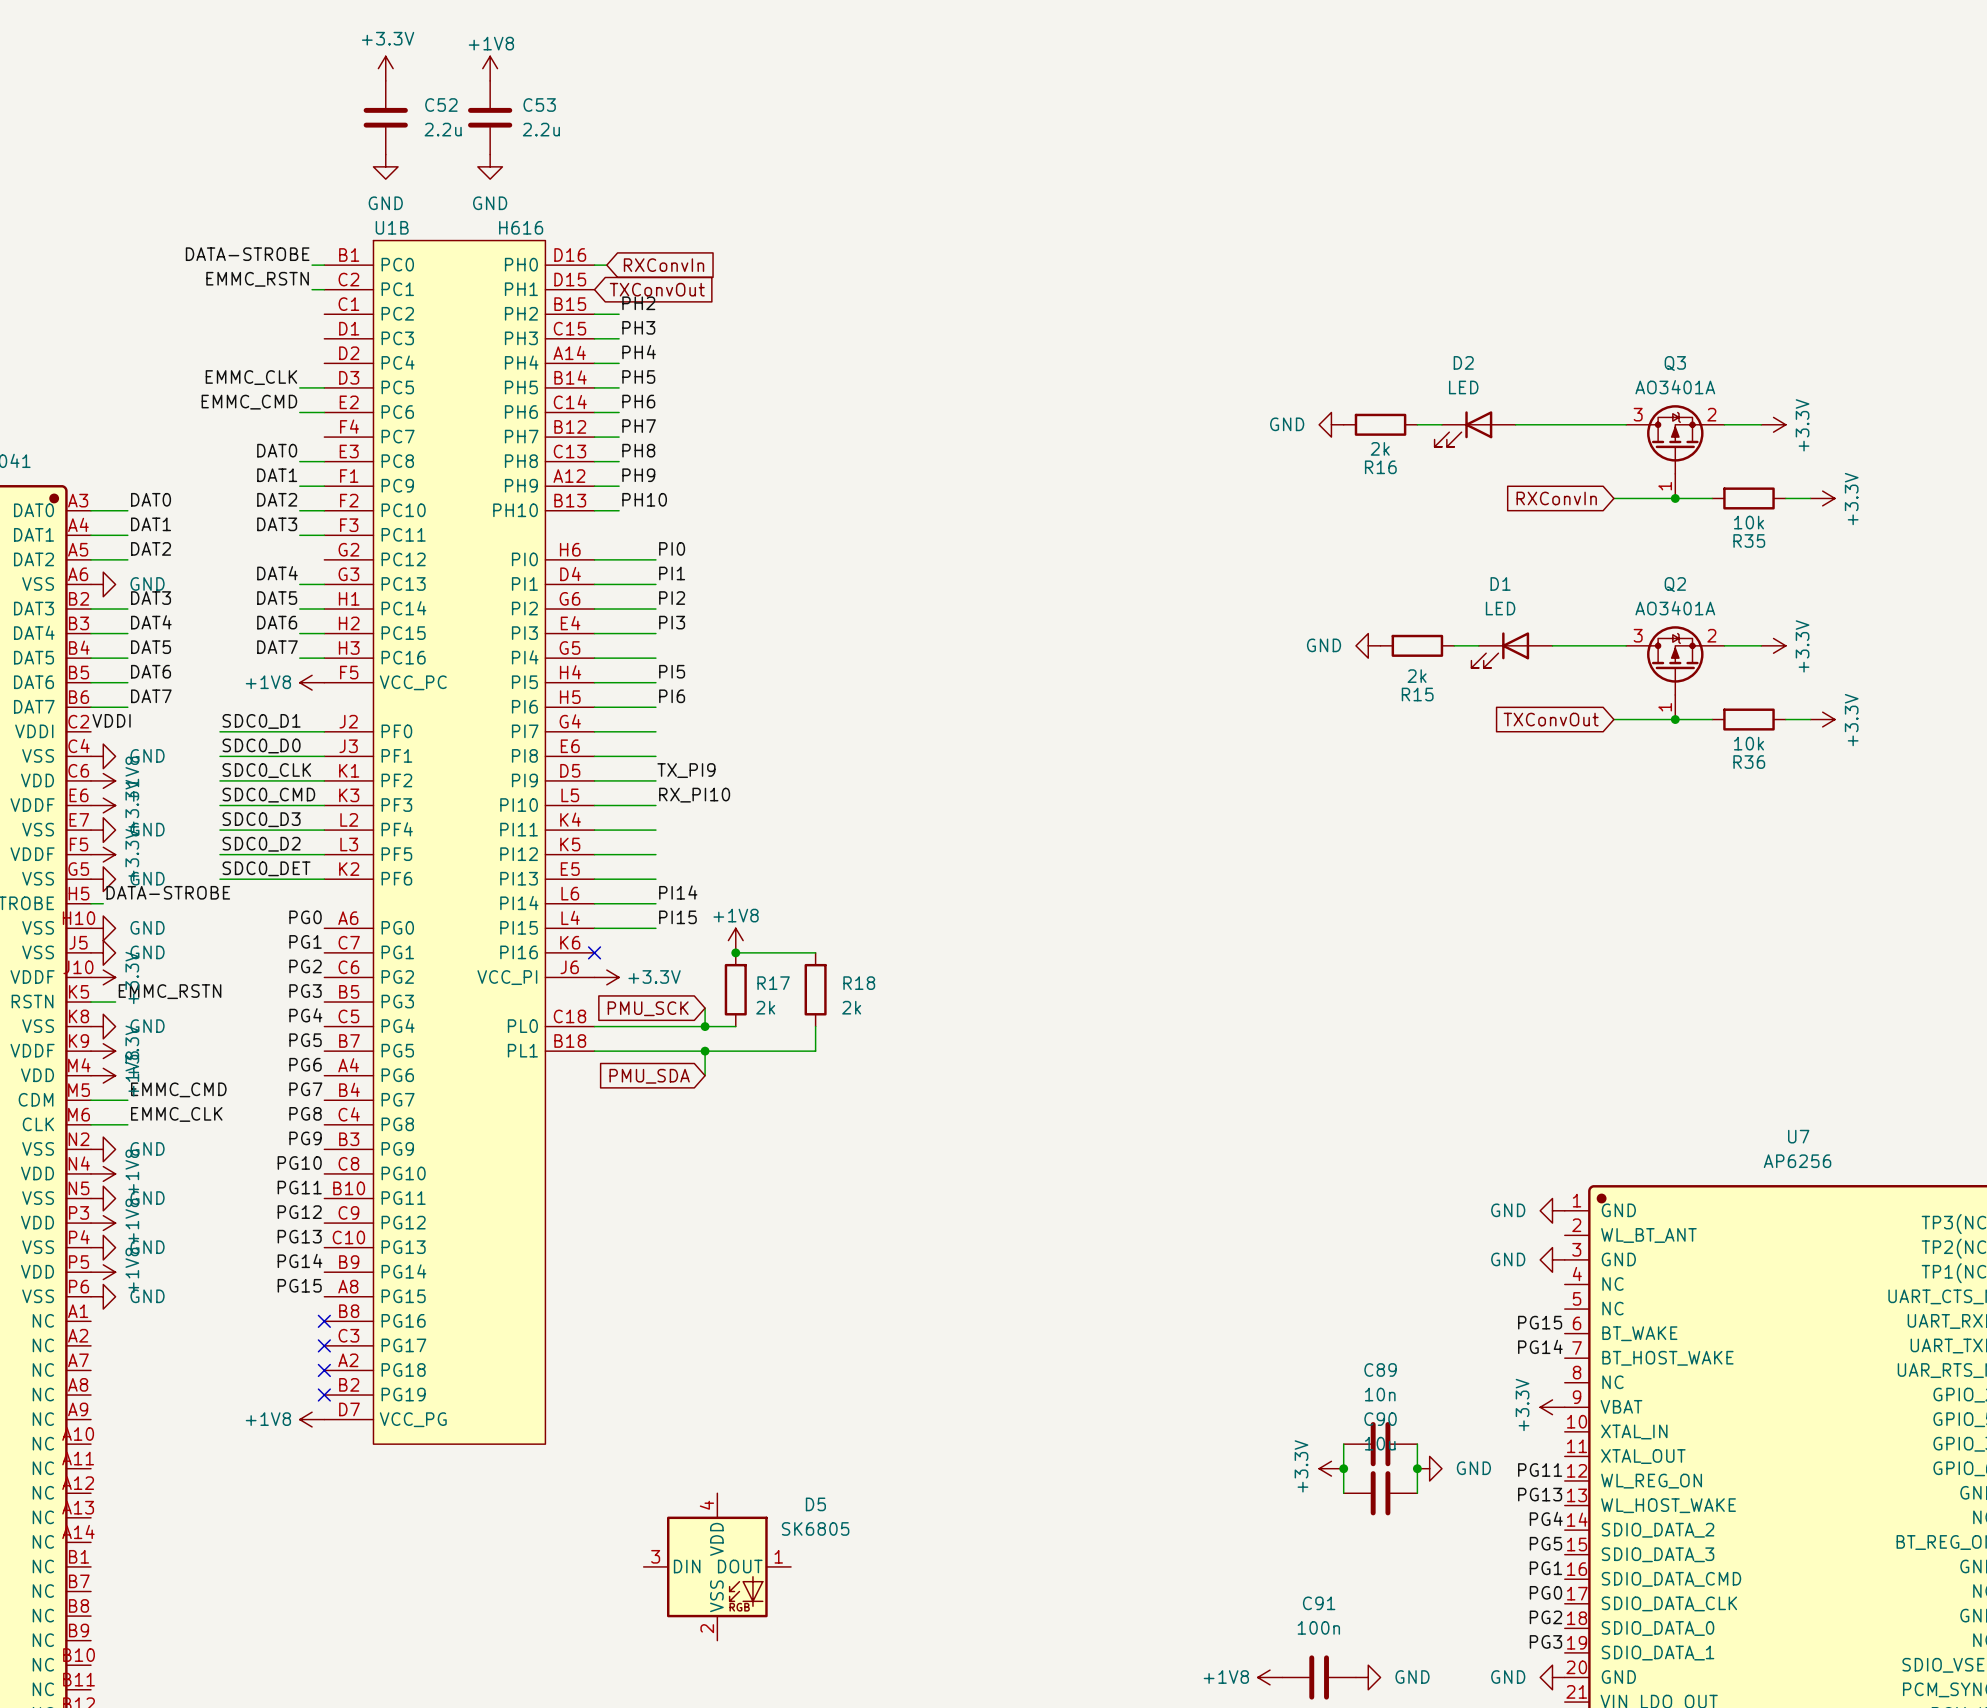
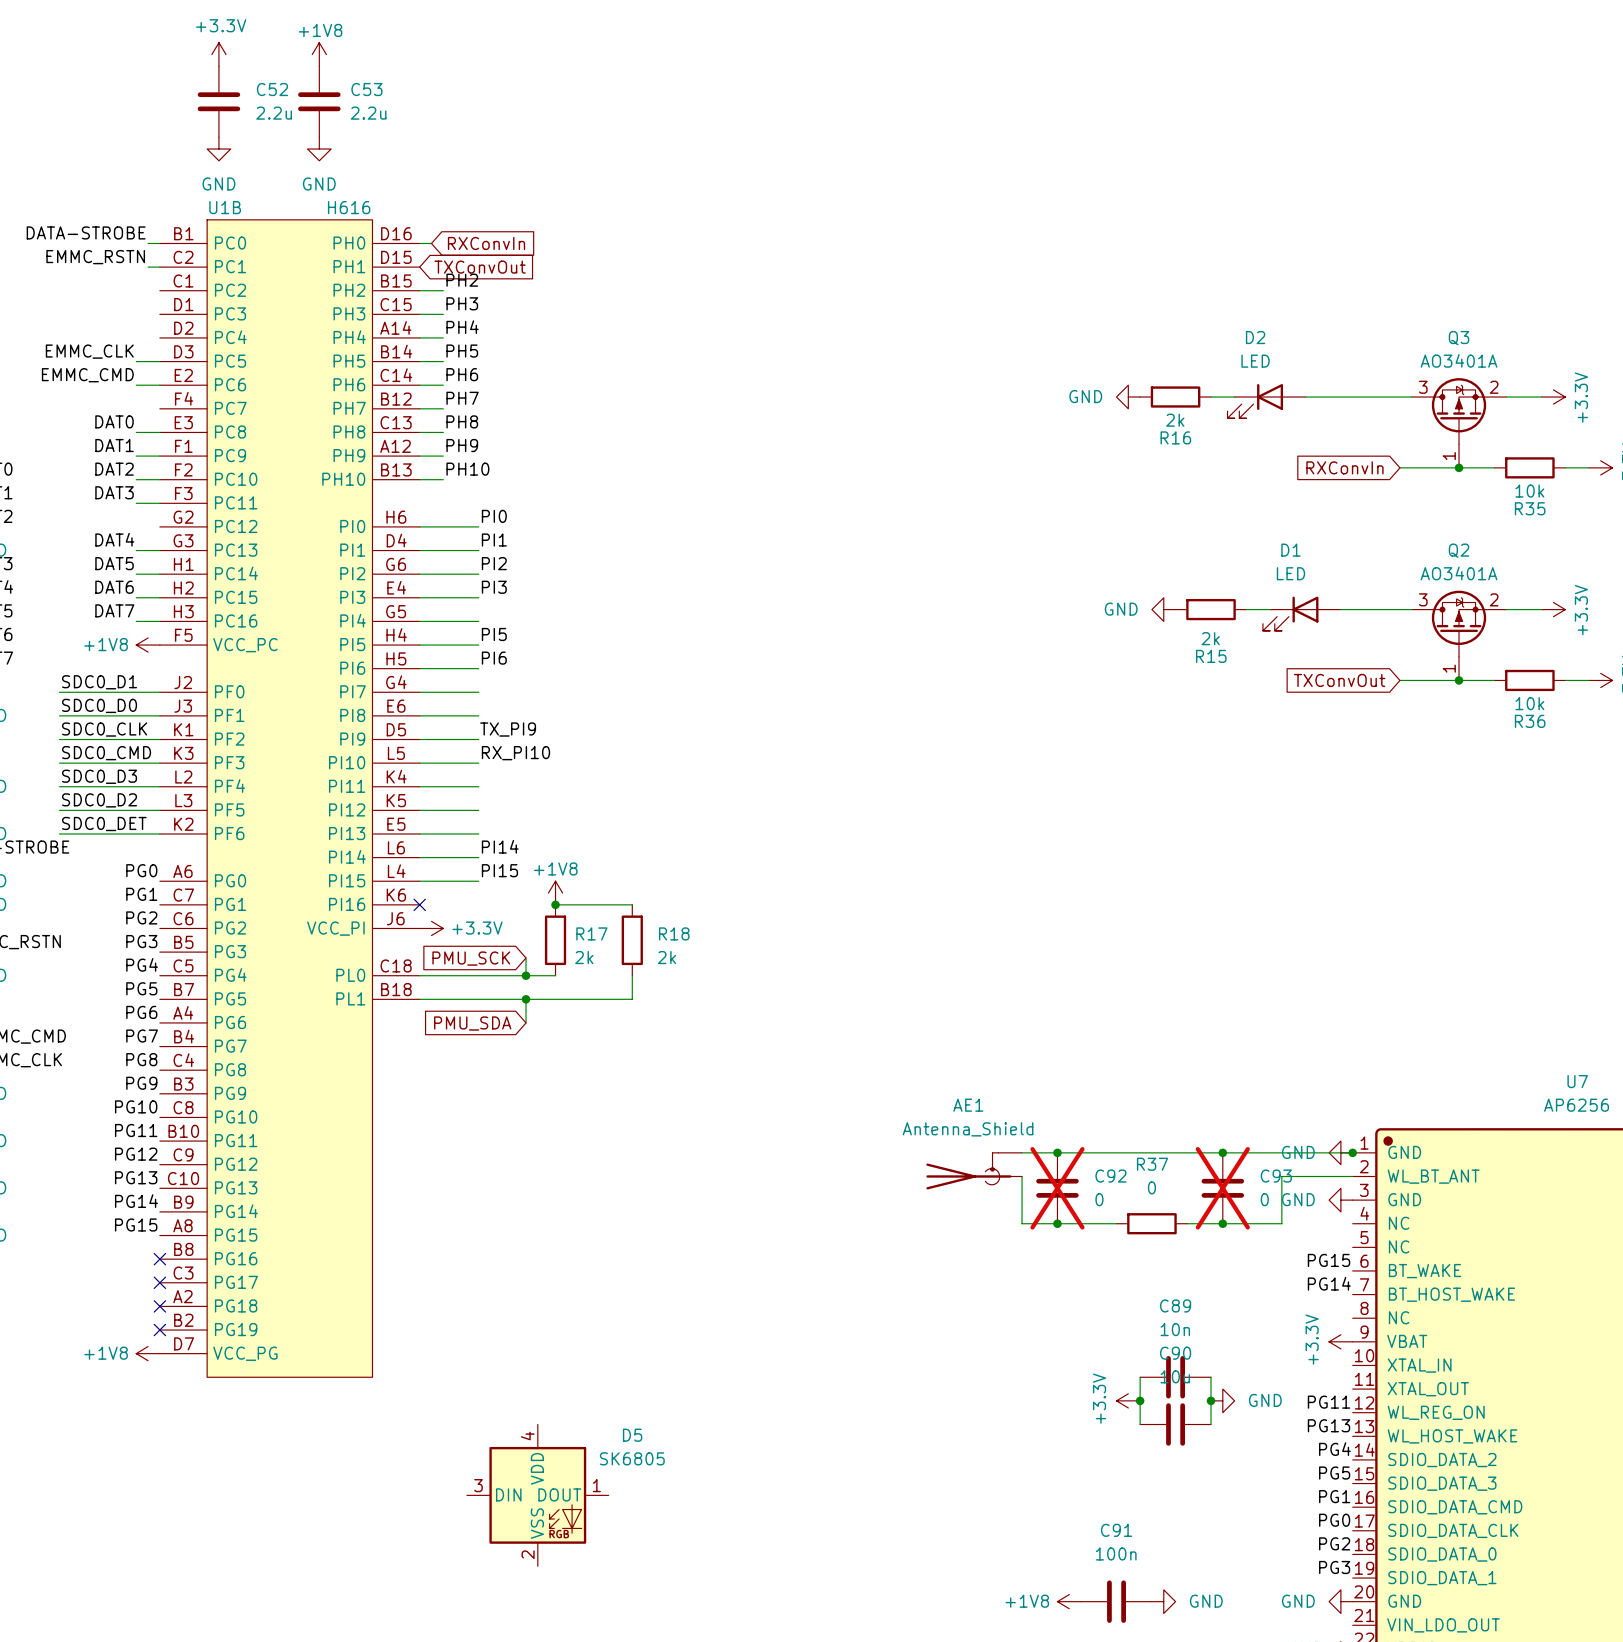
wire: none -> (1022, 1152) (1352, 1152)
junction: none -> (1057, 1152)
junction: none -> (1222, 1152)
junction: none -> (1352, 1152)
AE1: none -> Antenna_Shield (974, 1171)
wire: none -> (1022, 1176) (1022, 1223) (1116, 1223)
wire: none -> (1352, 1176) (1281, 1176) (1281, 1223) (1187, 1223)
C92: none -> 0 (1057, 1188)
C93: none -> 0 (1222, 1188)
junction: none -> (1057, 1223)
R37: none -> 0 (1151, 1223)
junction: none -> (1222, 1223)

